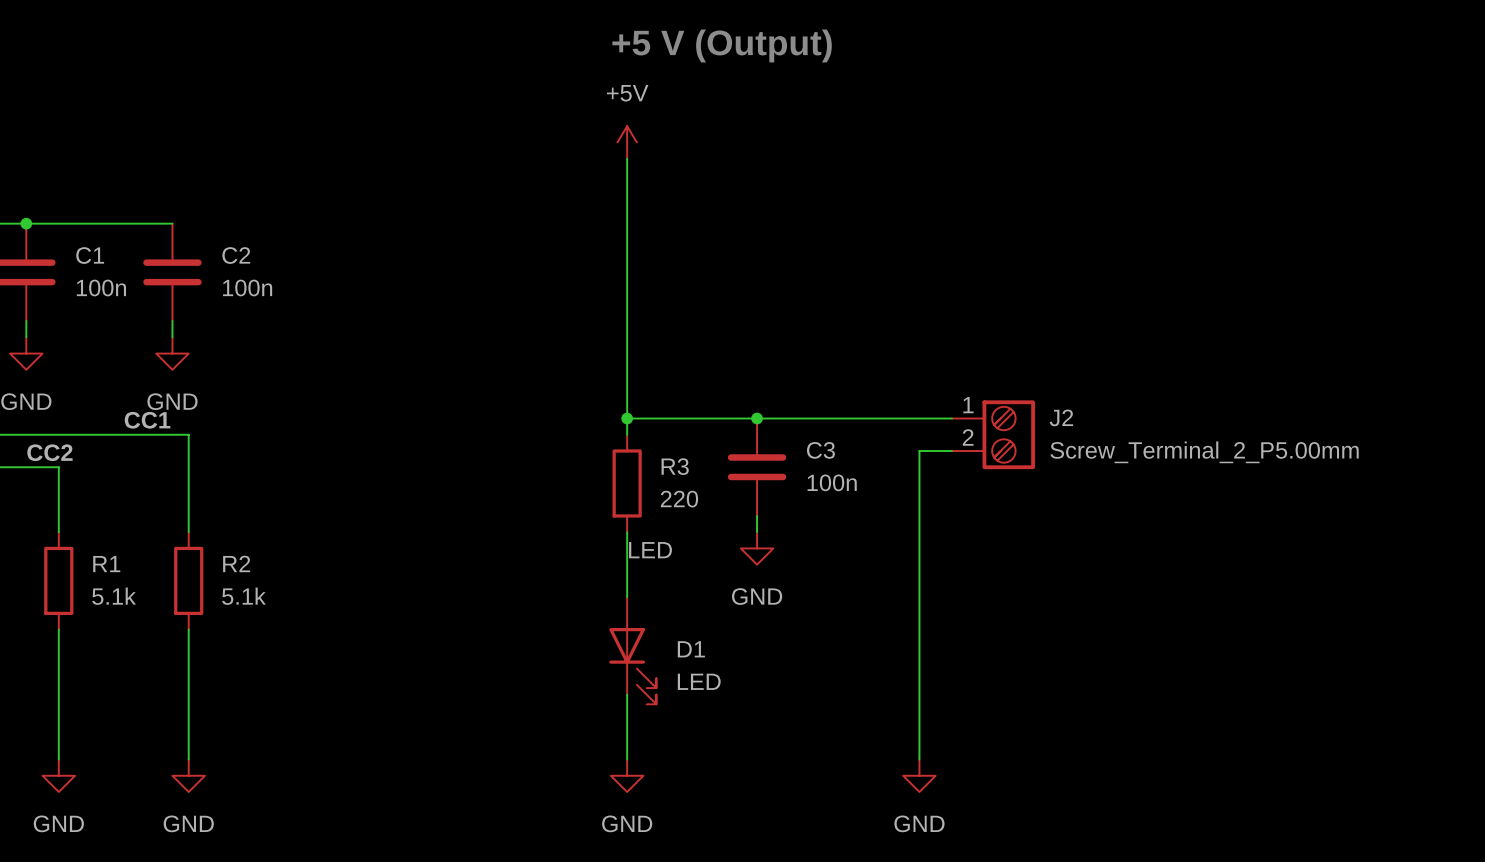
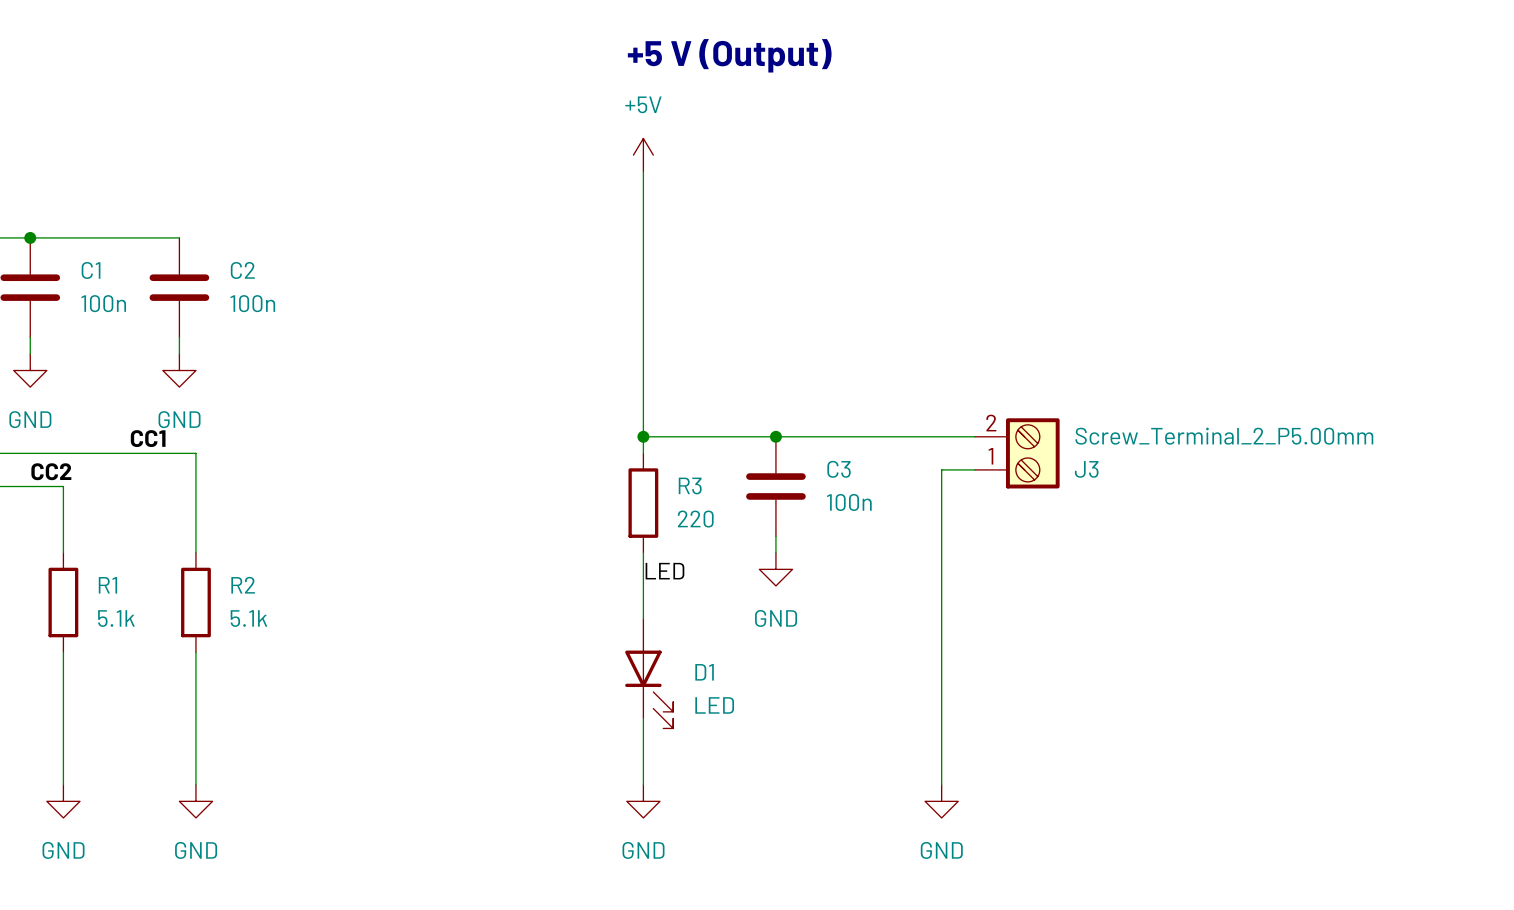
J2: Screw_Terminal_2_P5.00mm (993, 434) -> none
J3: none -> Screw_Terminal_2_P5.00mm (1017, 453)

